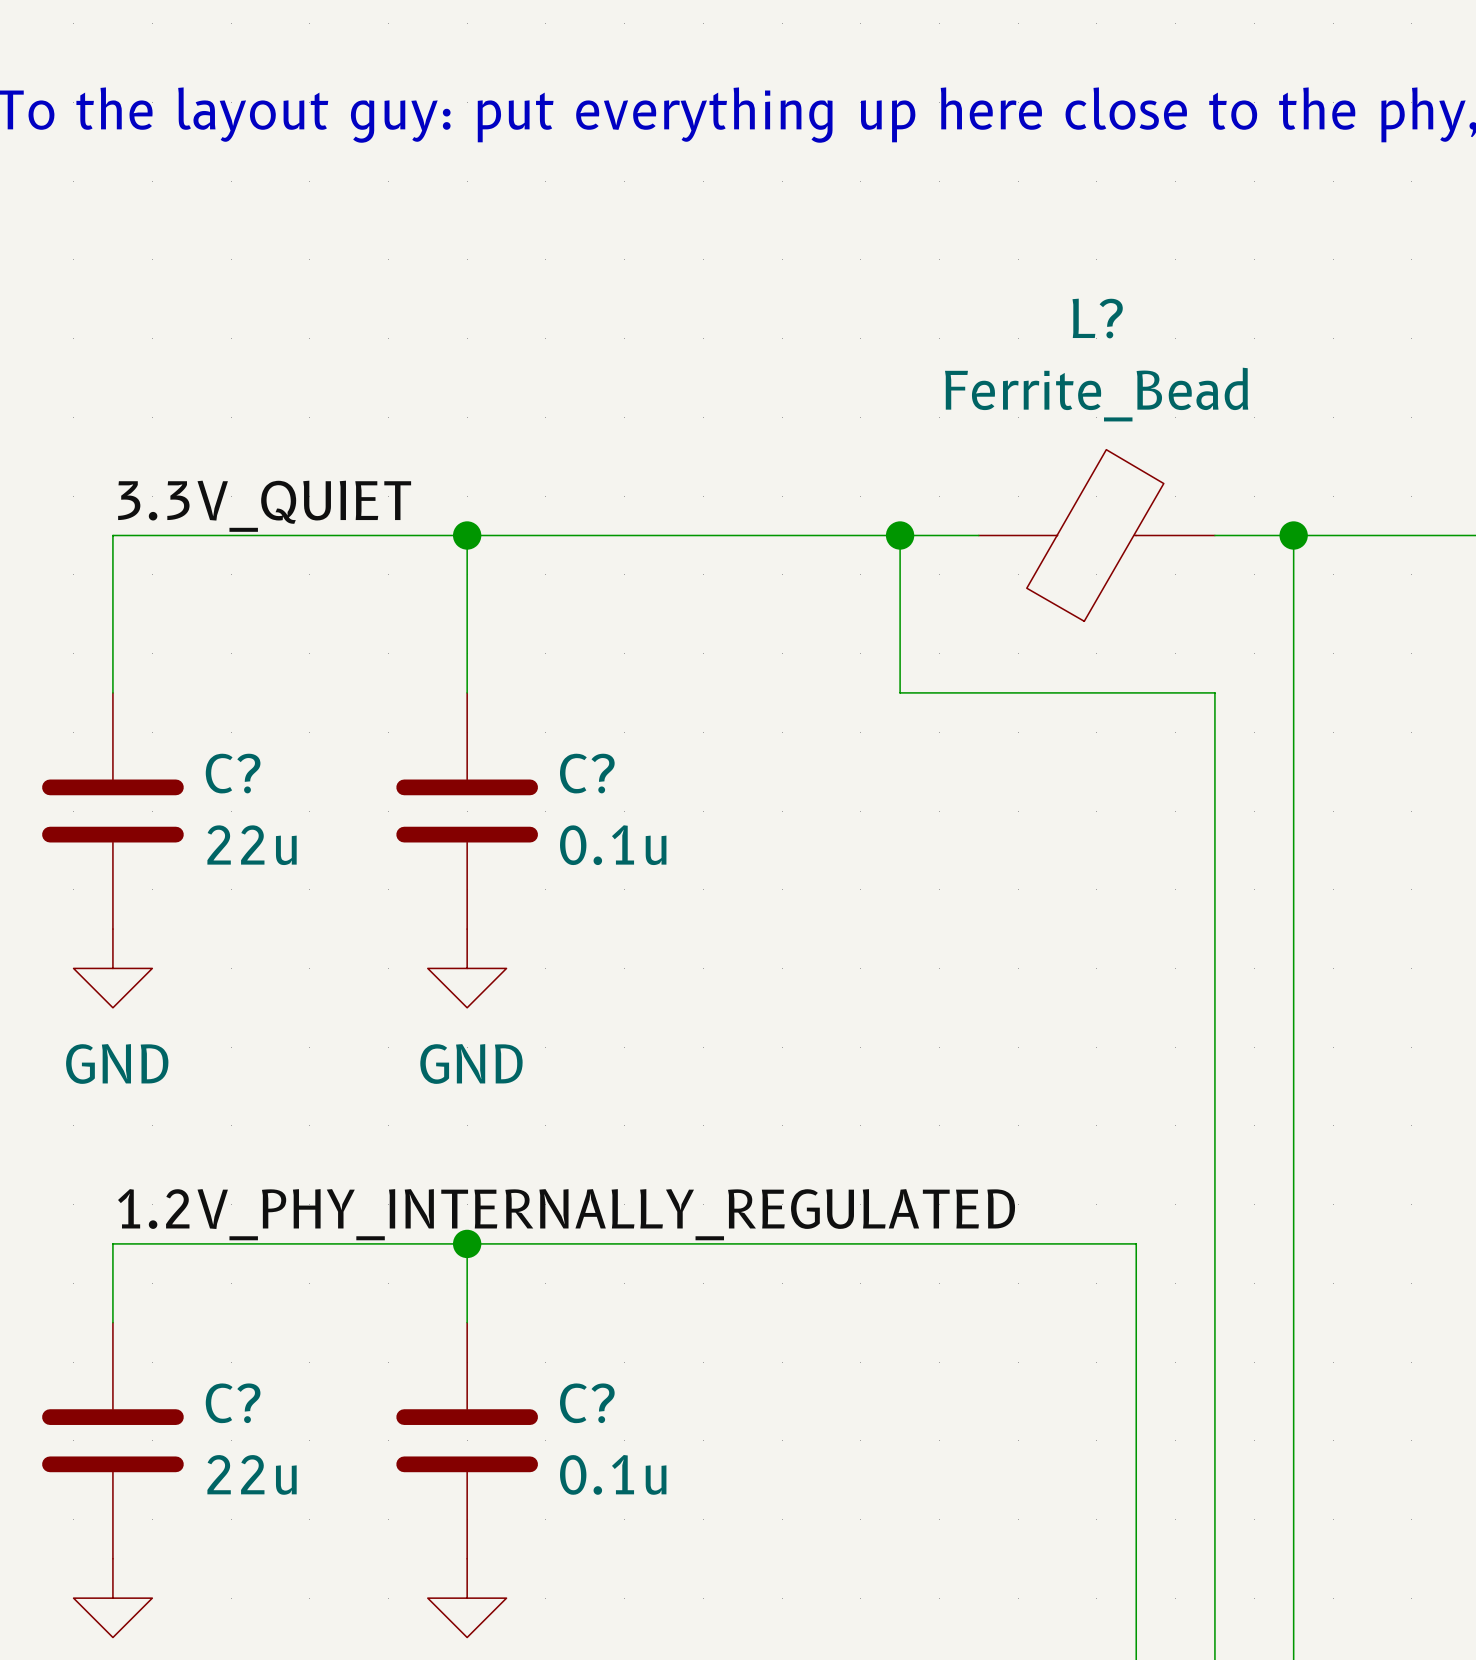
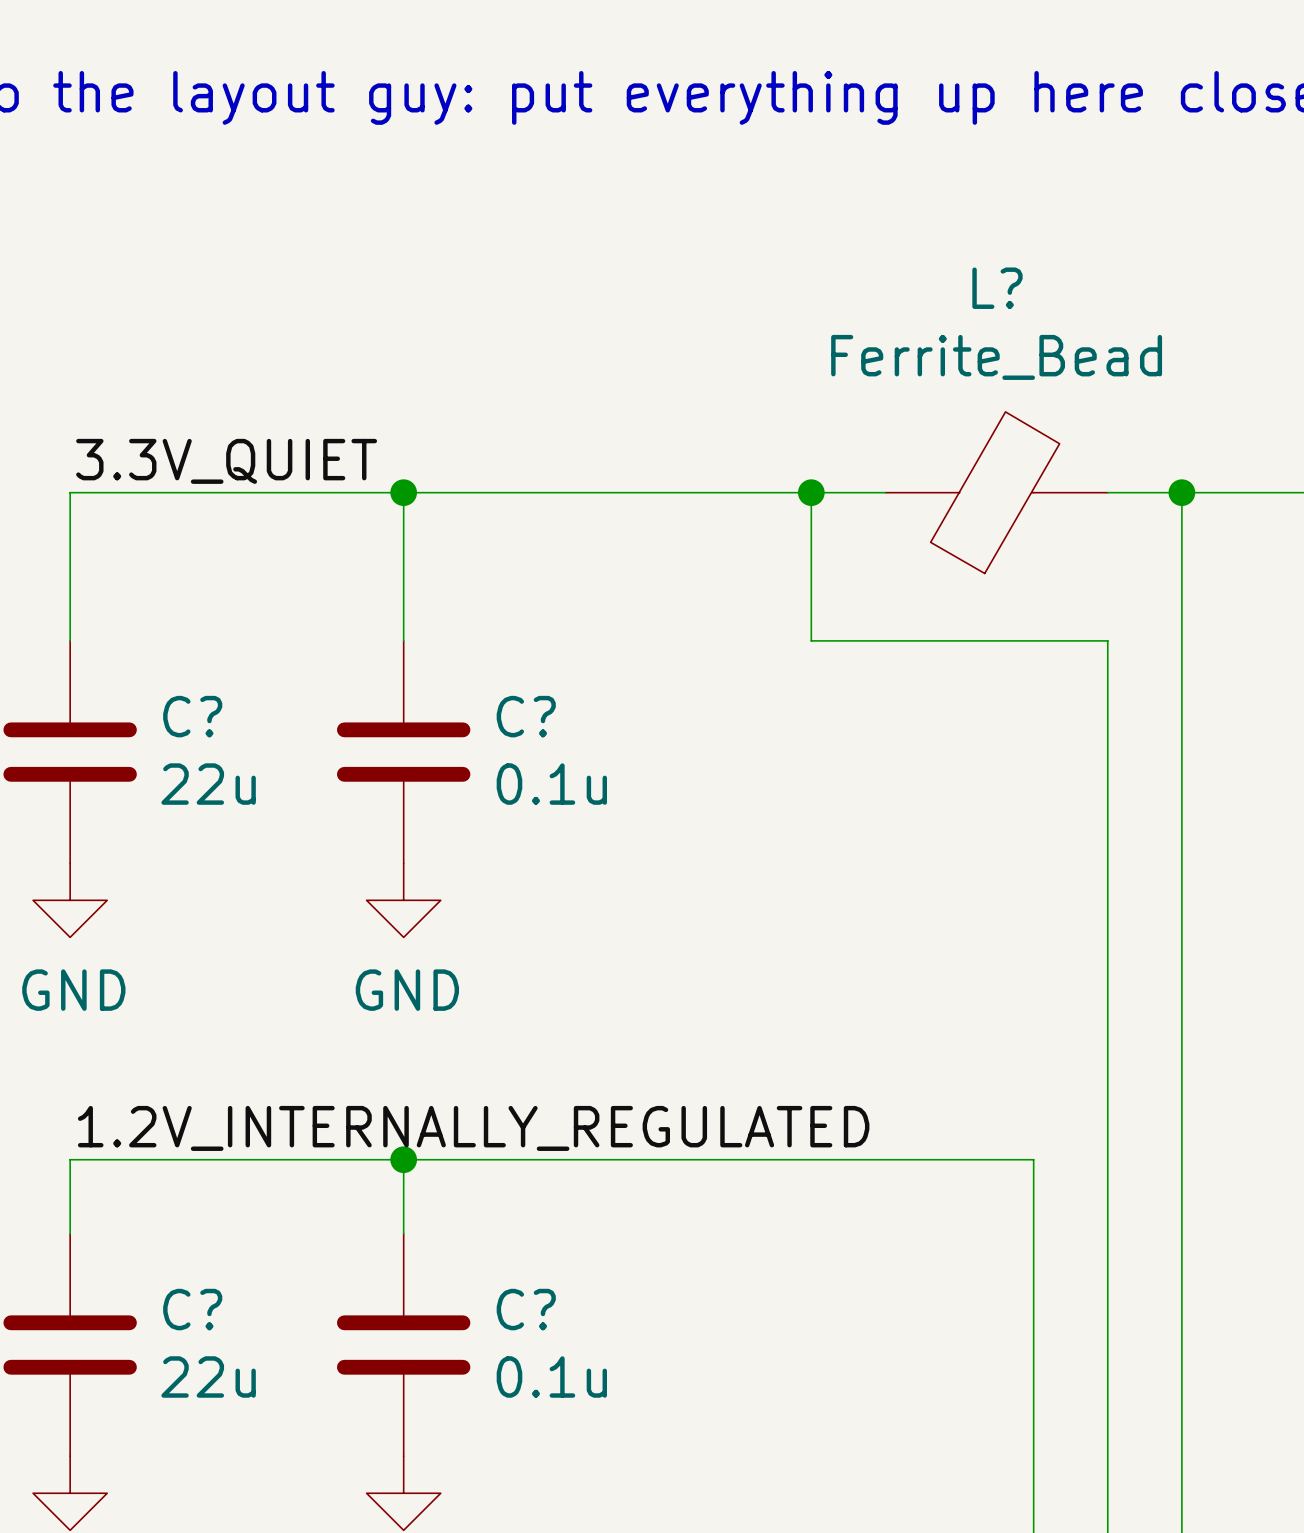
label: 1.2V_PHY_INTERNALLY_REGULATED (566, 1214) -> 1.2V_INTERNALLY_REGULATED (473, 1128)

